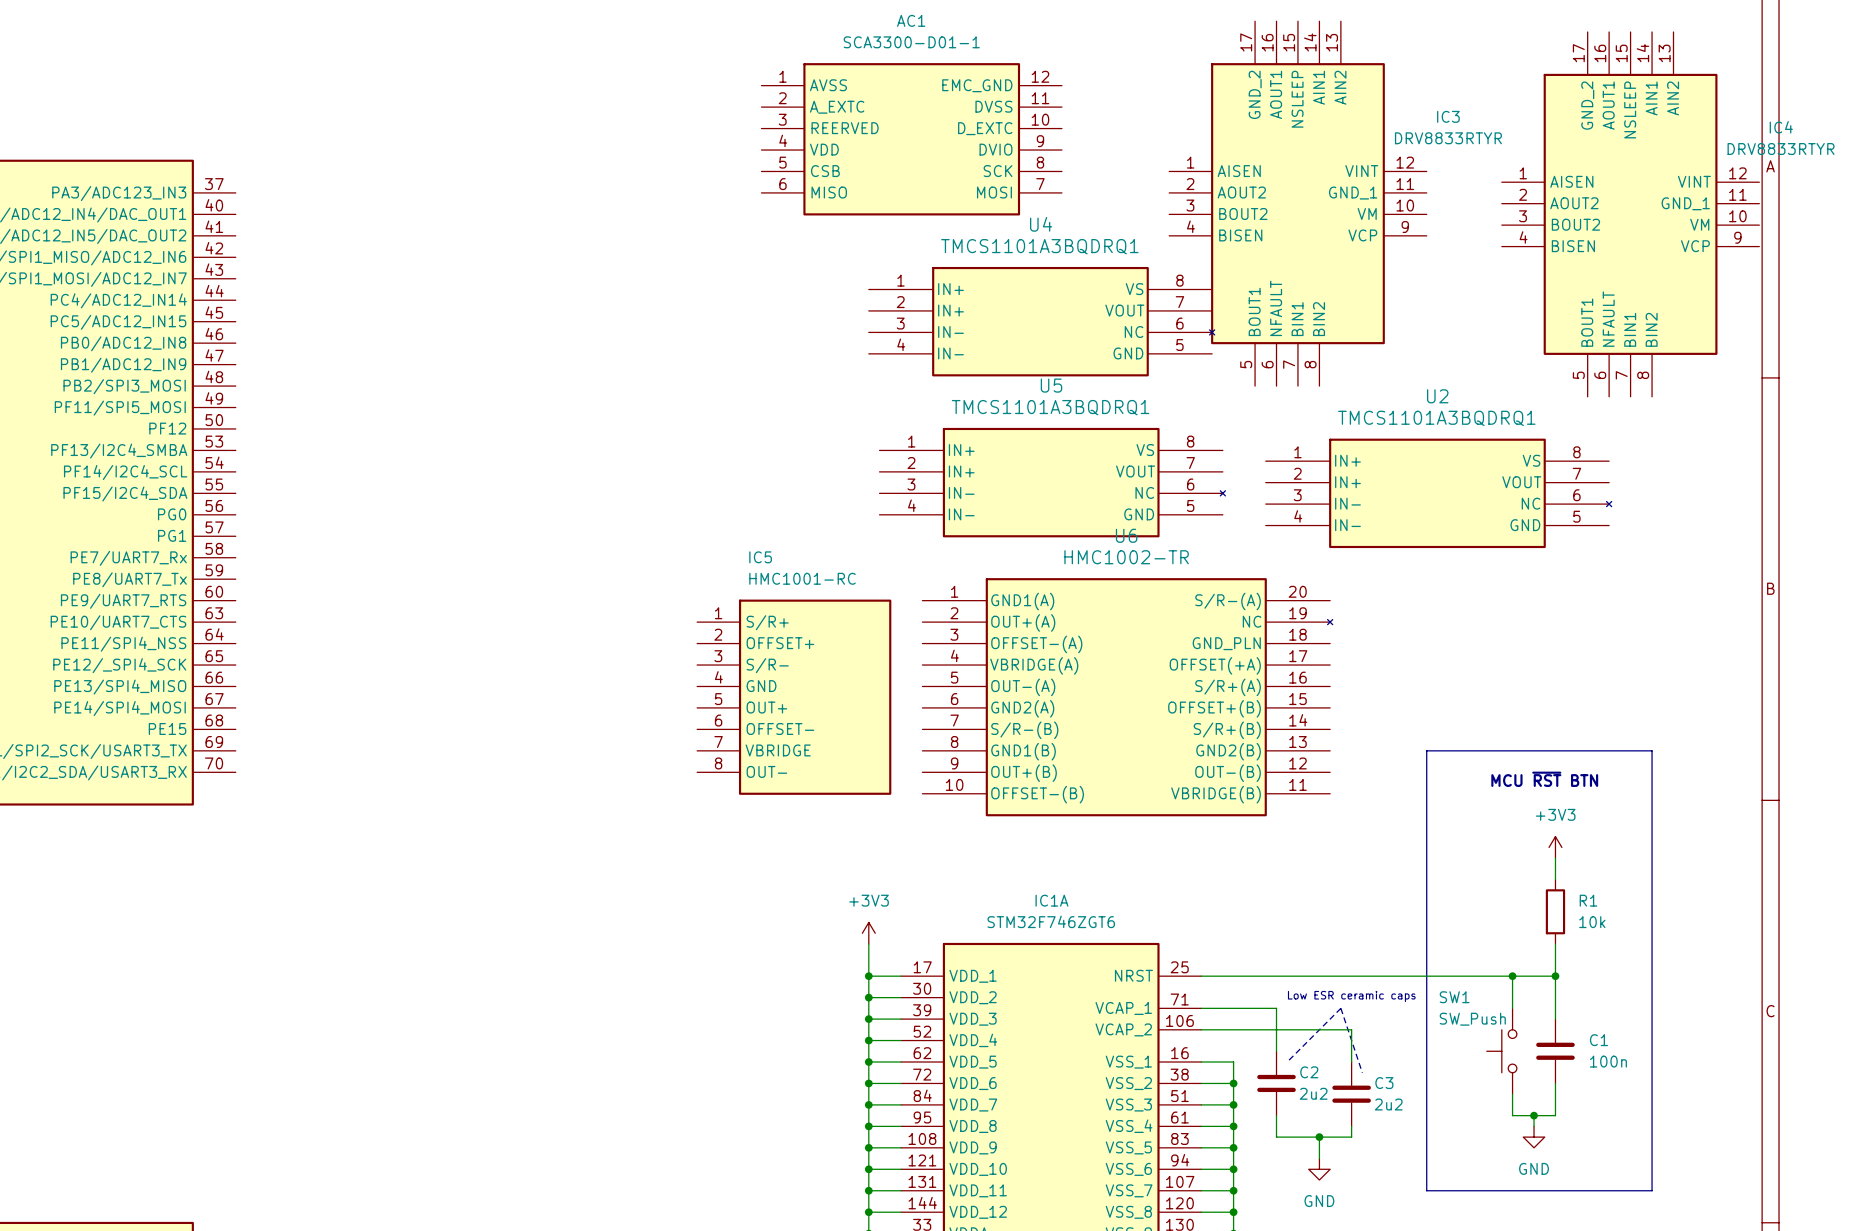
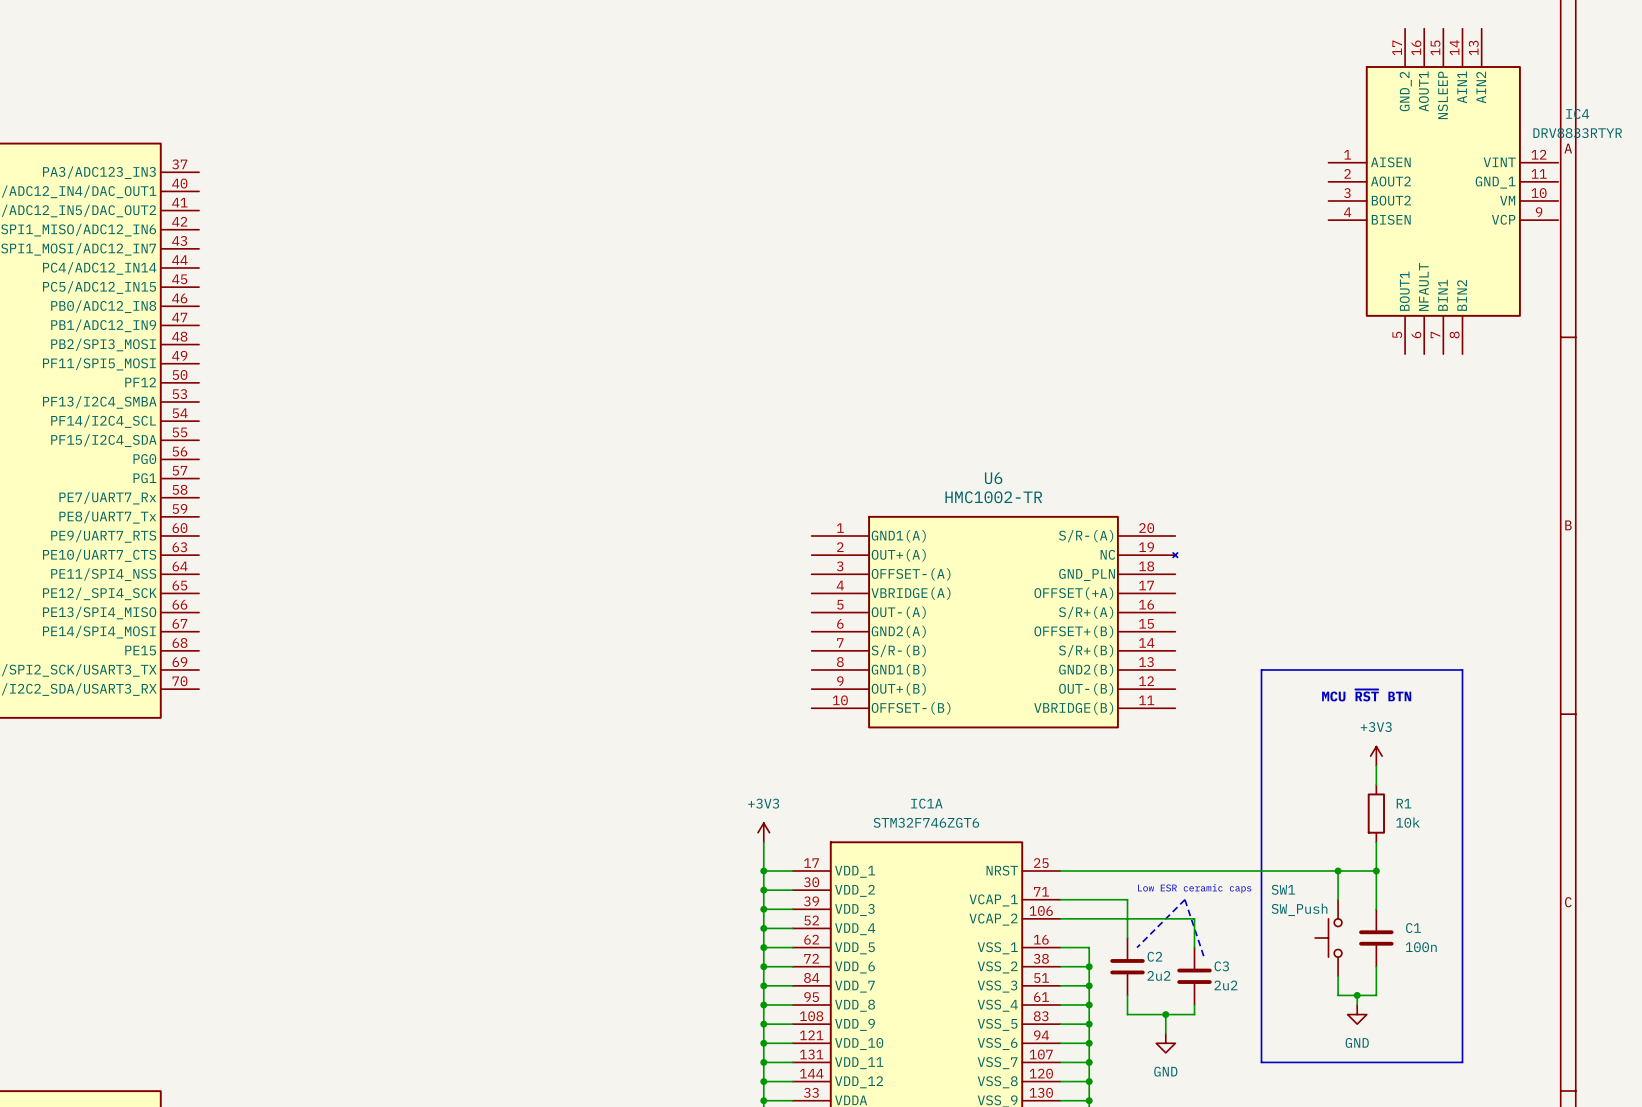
AC1: SCA3300-D01-1 (911, 139) -> none
IC3: DRV8833RTYR (1297, 203) -> none
U4: TMCS1101A3BQDRQ1 (1041, 321) -> none
U5: TMCS1101A3BQDRQ1 (1052, 482) -> none
U2: TMCS1101A3BQDRQ1 (1438, 493) -> none
IC5: HMC1001-RC (794, 697) -> none

